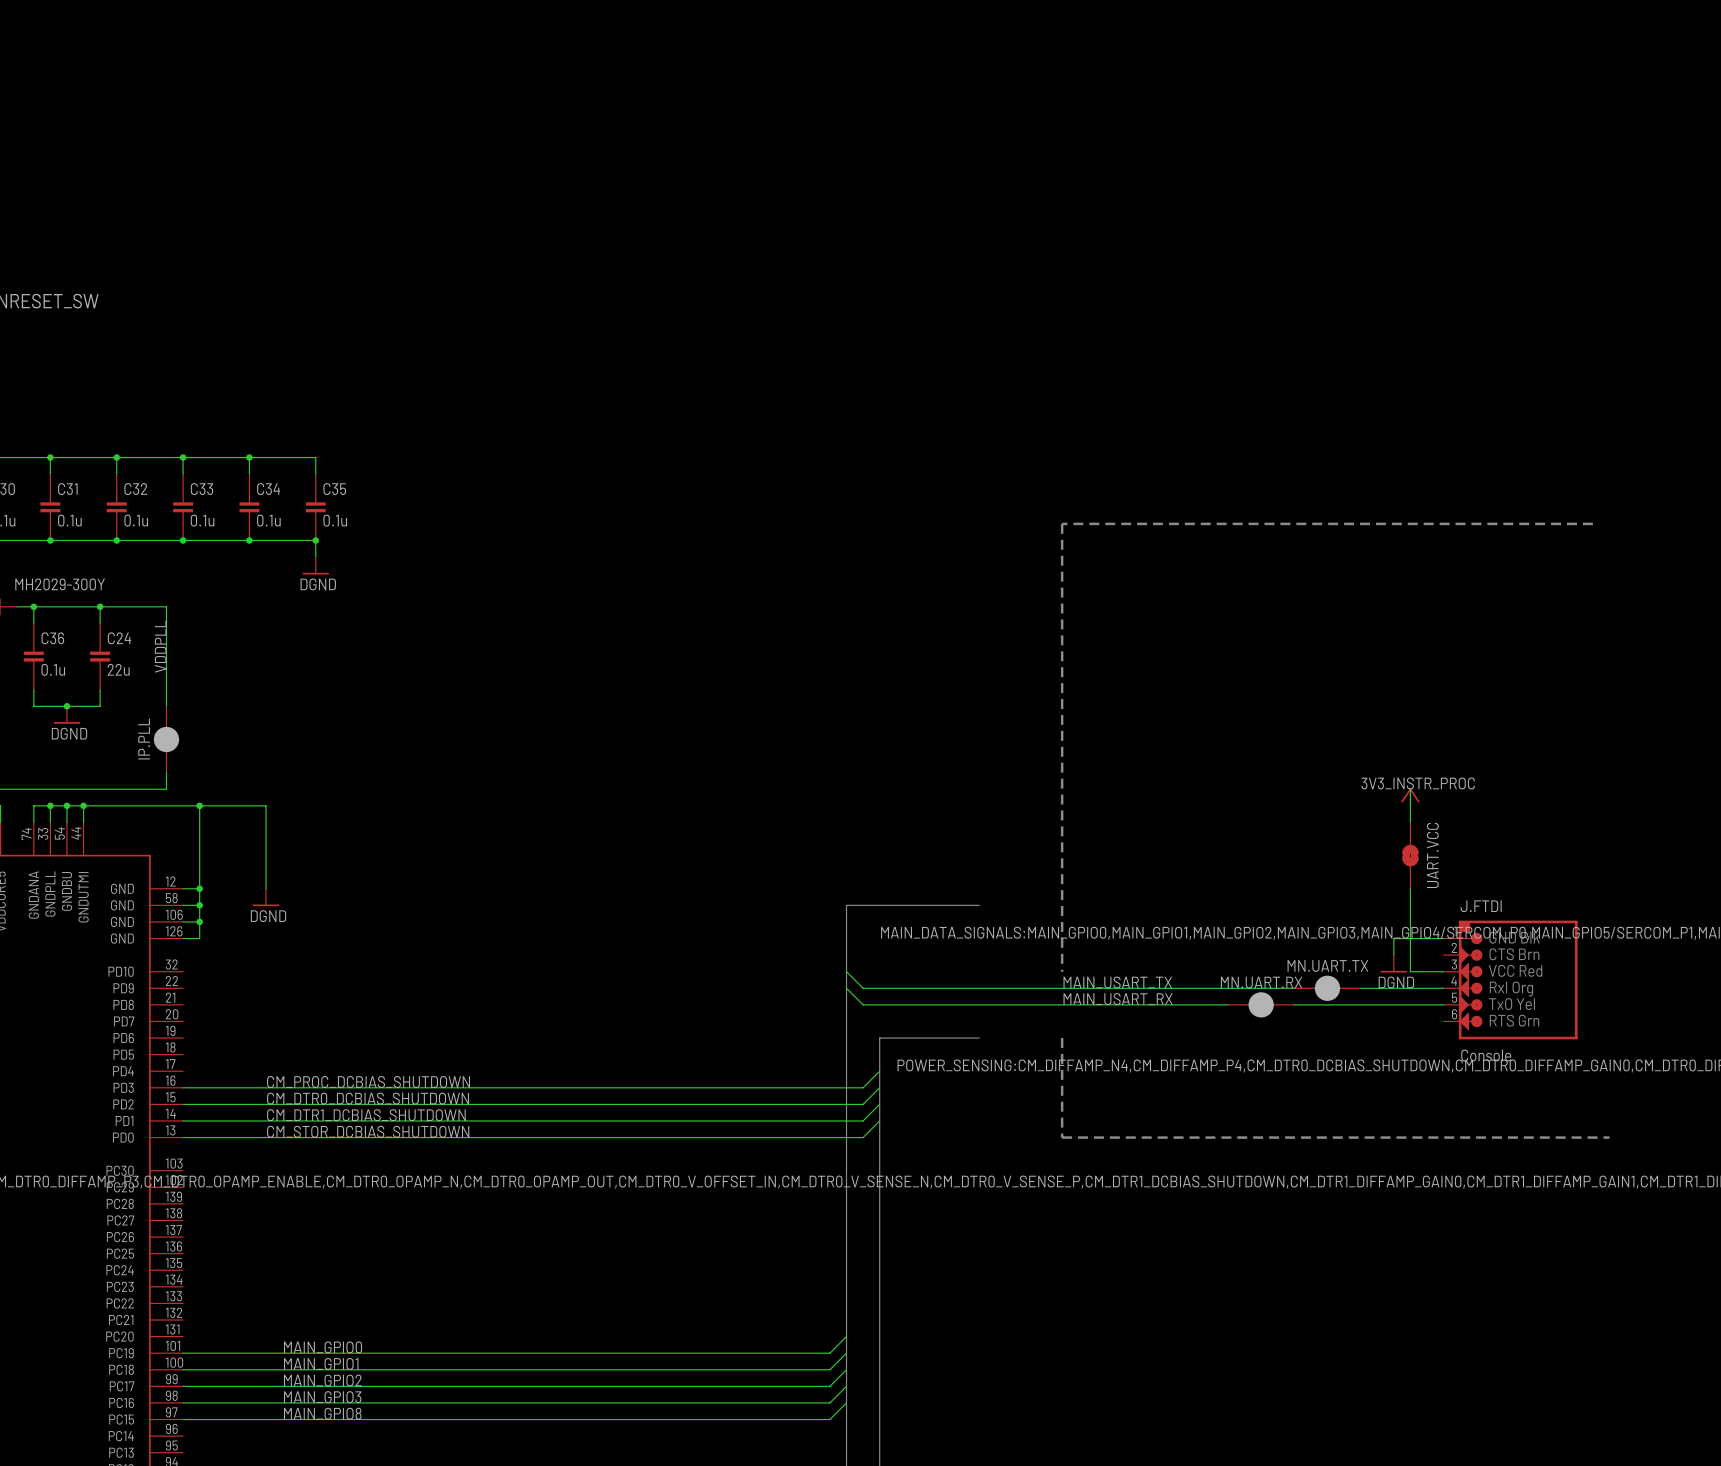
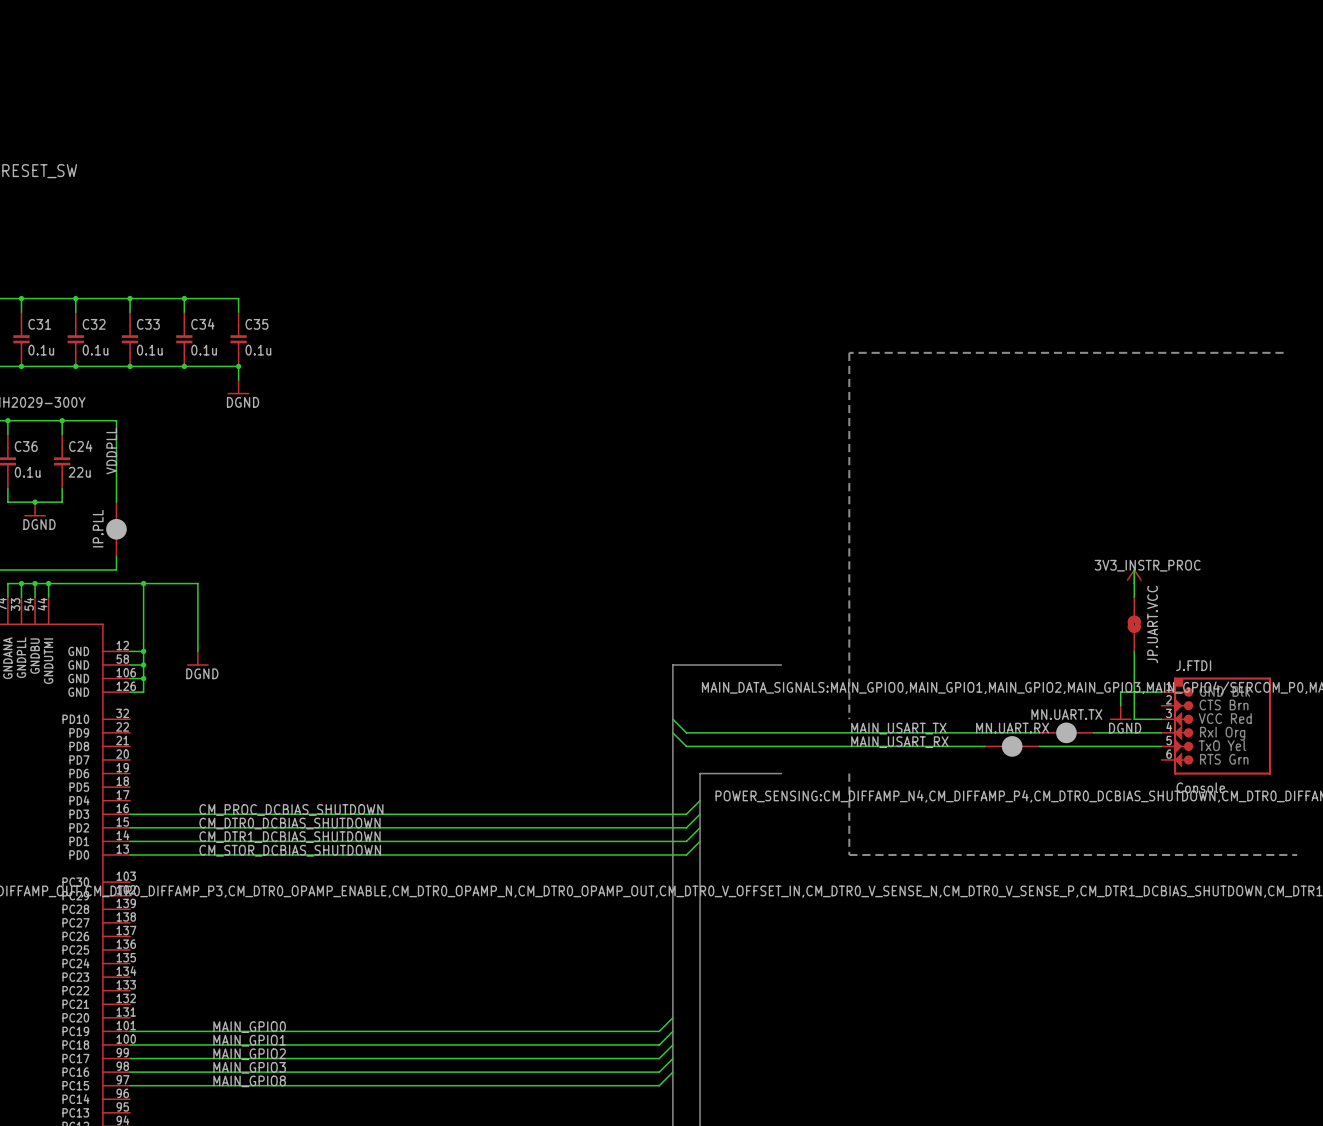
UART.VCC name: UART.VCC (1432, 855) -> JP.UART.VCC (1152, 624)

